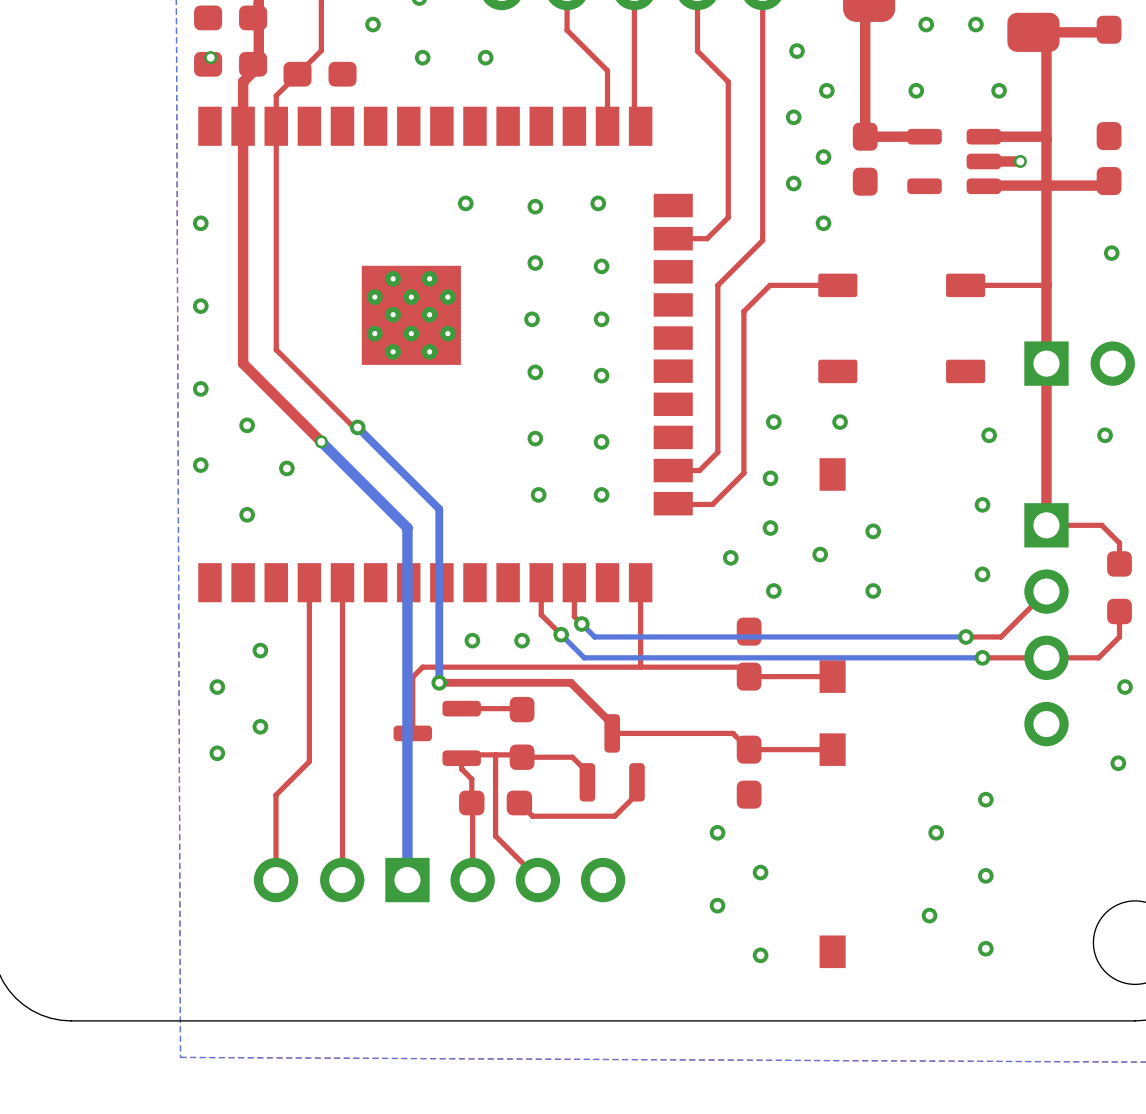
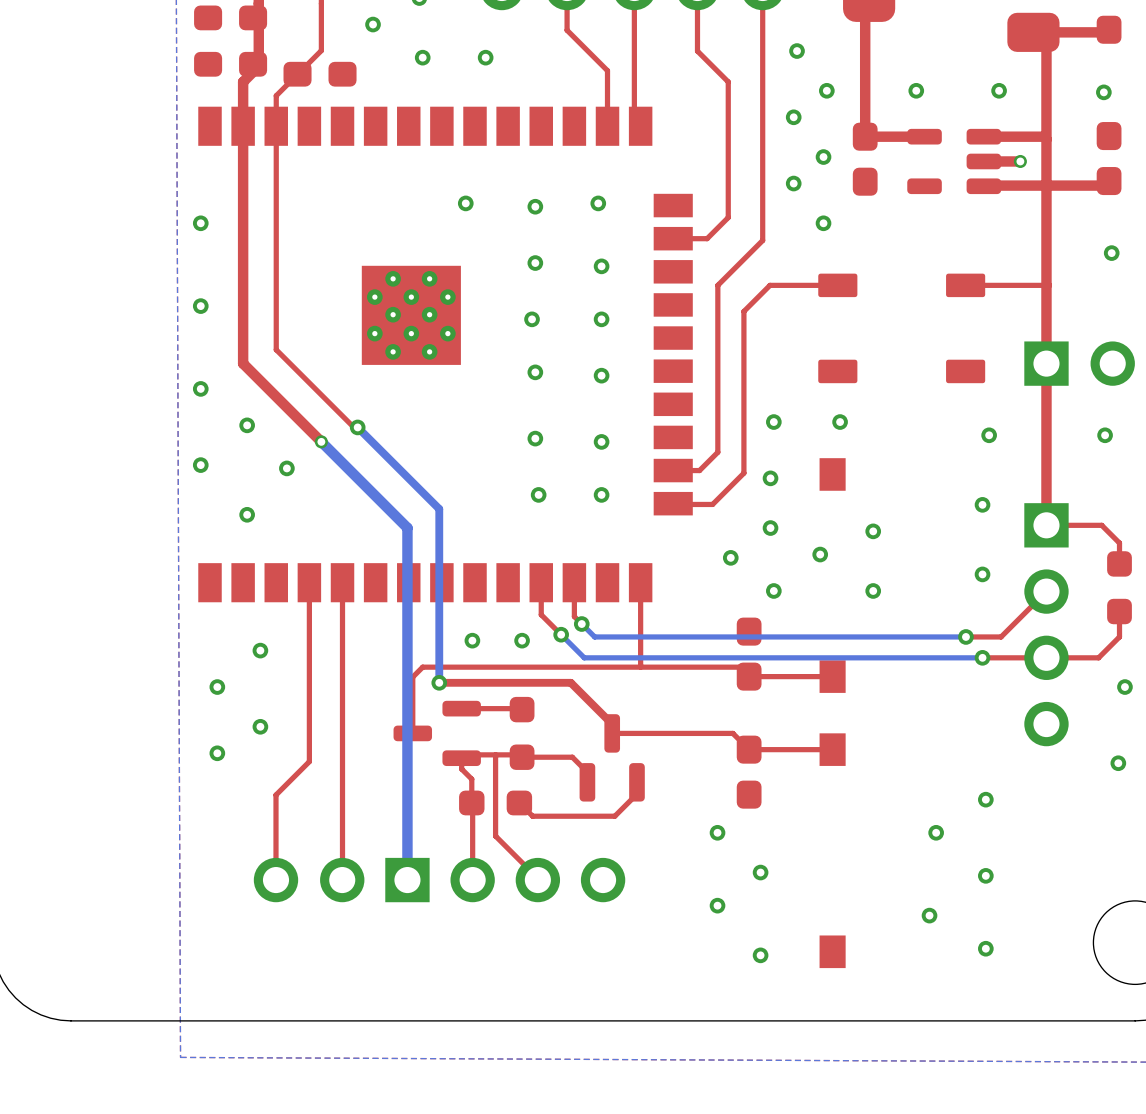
via: (926, 24) -> none
via: (975, 24) -> none
via: (210, 57) -> none
via: none -> (1103, 92)

